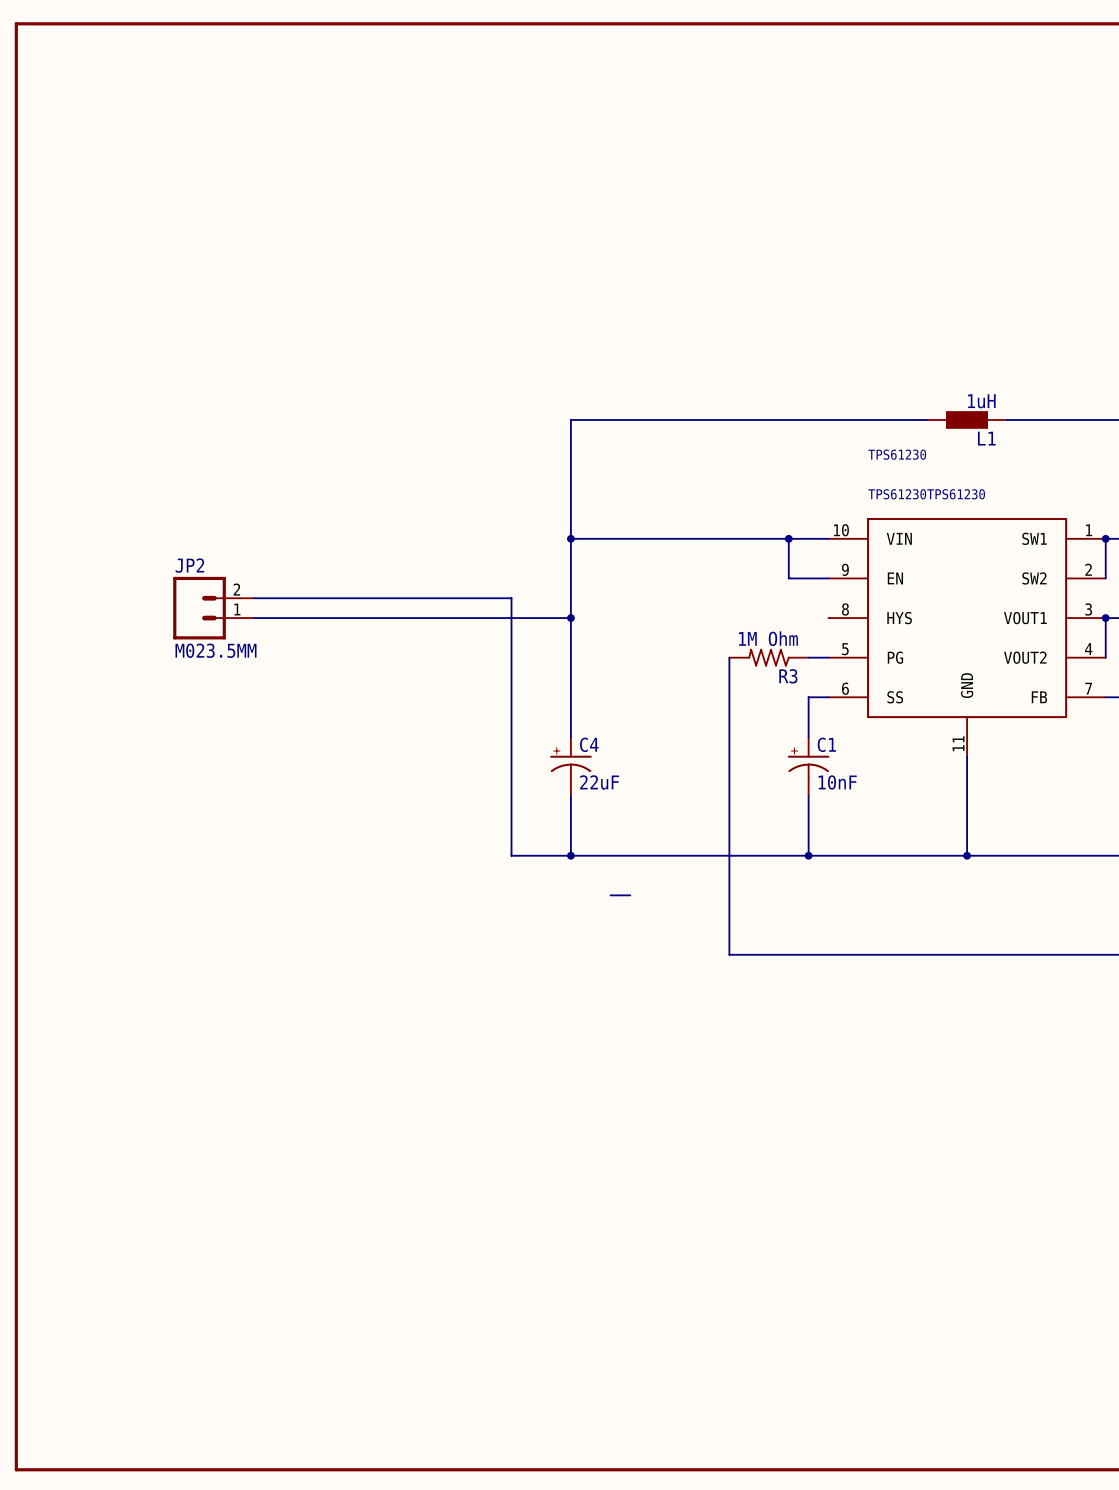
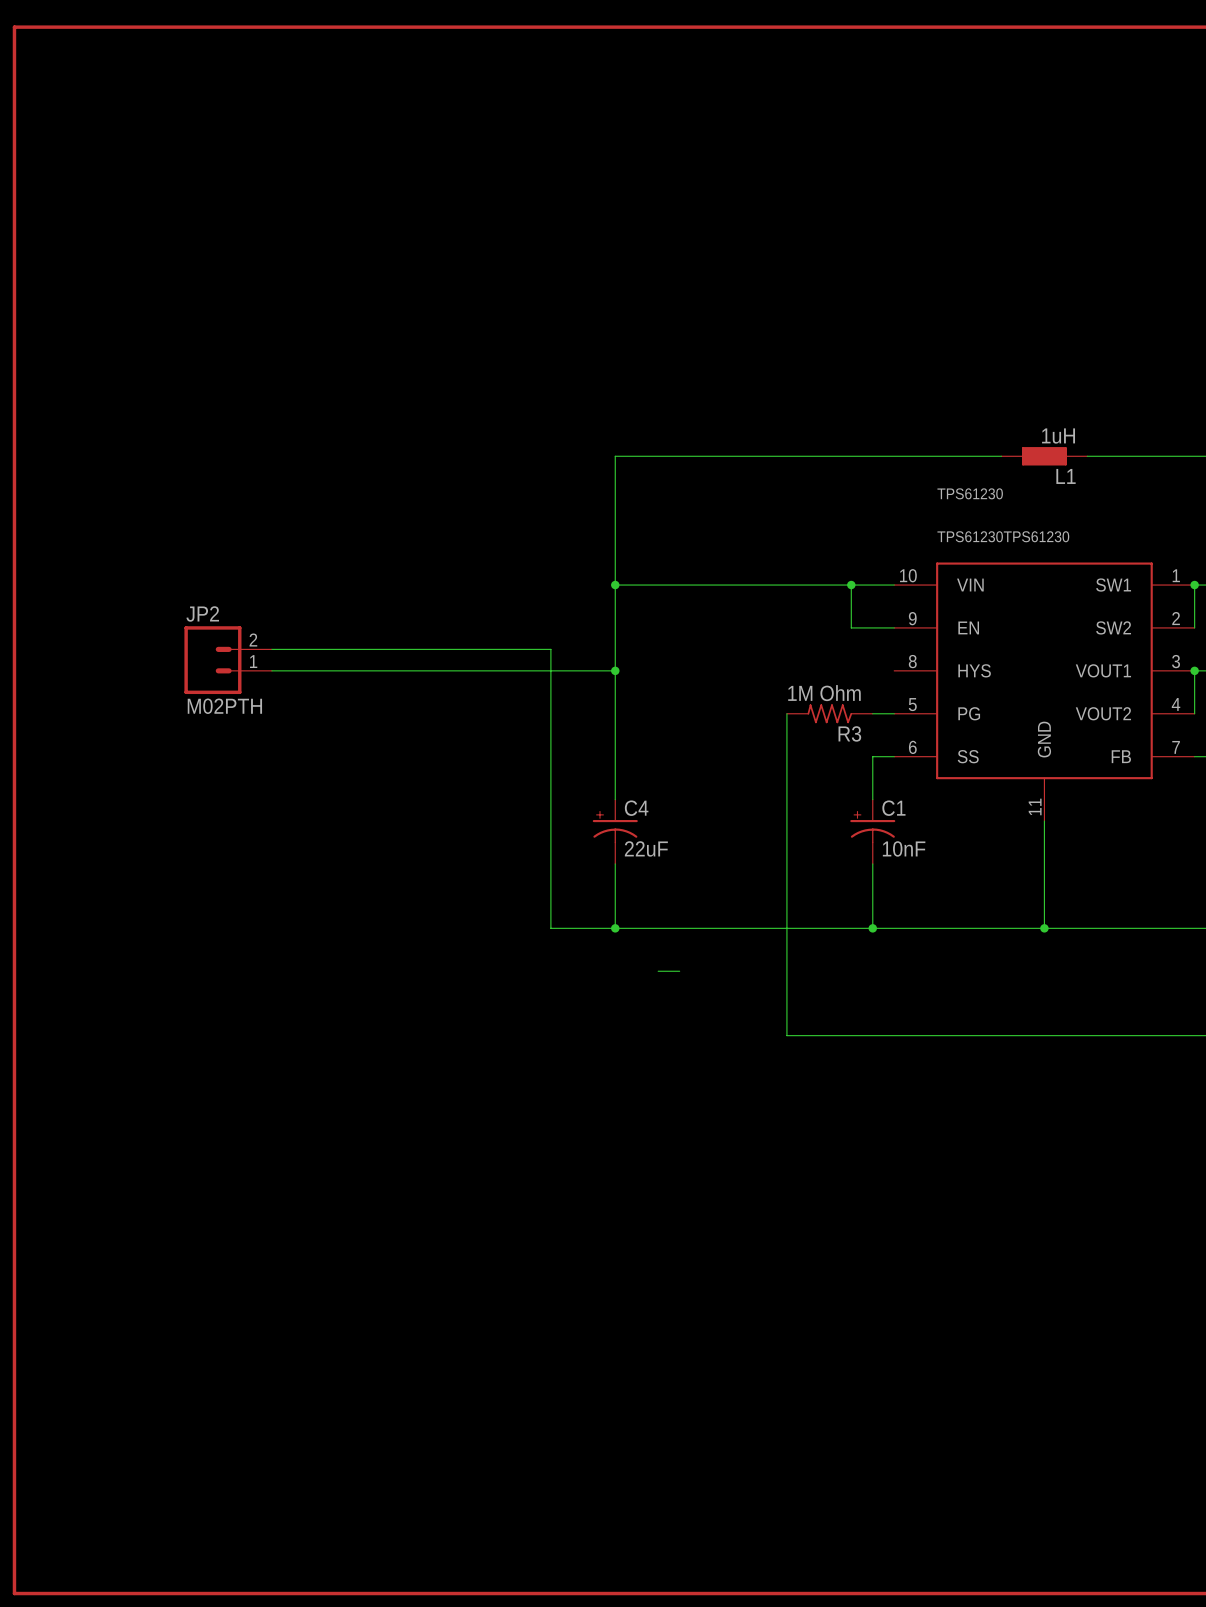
JP2 value: M023.5MM (215, 650) -> M02PTH (224, 706)

